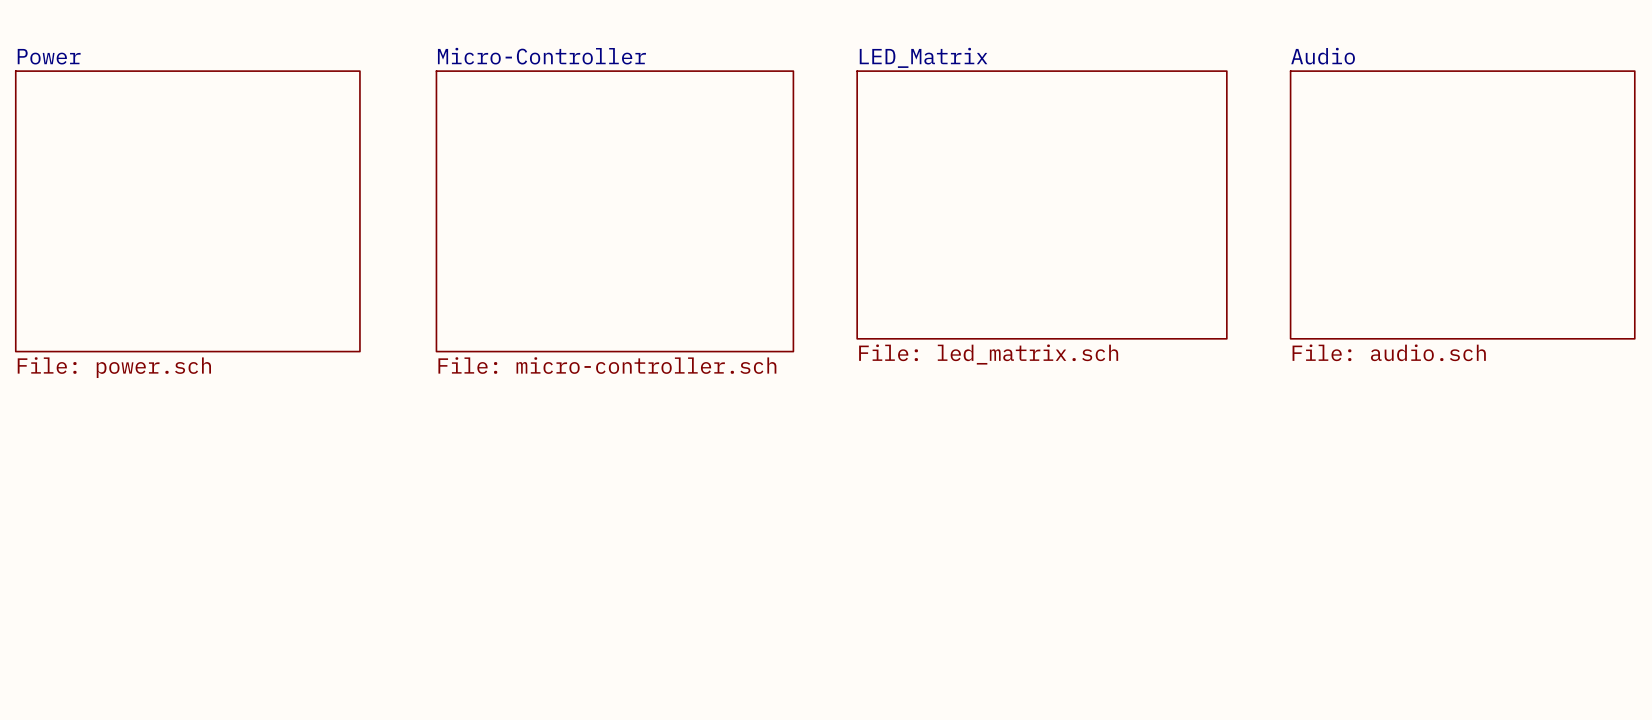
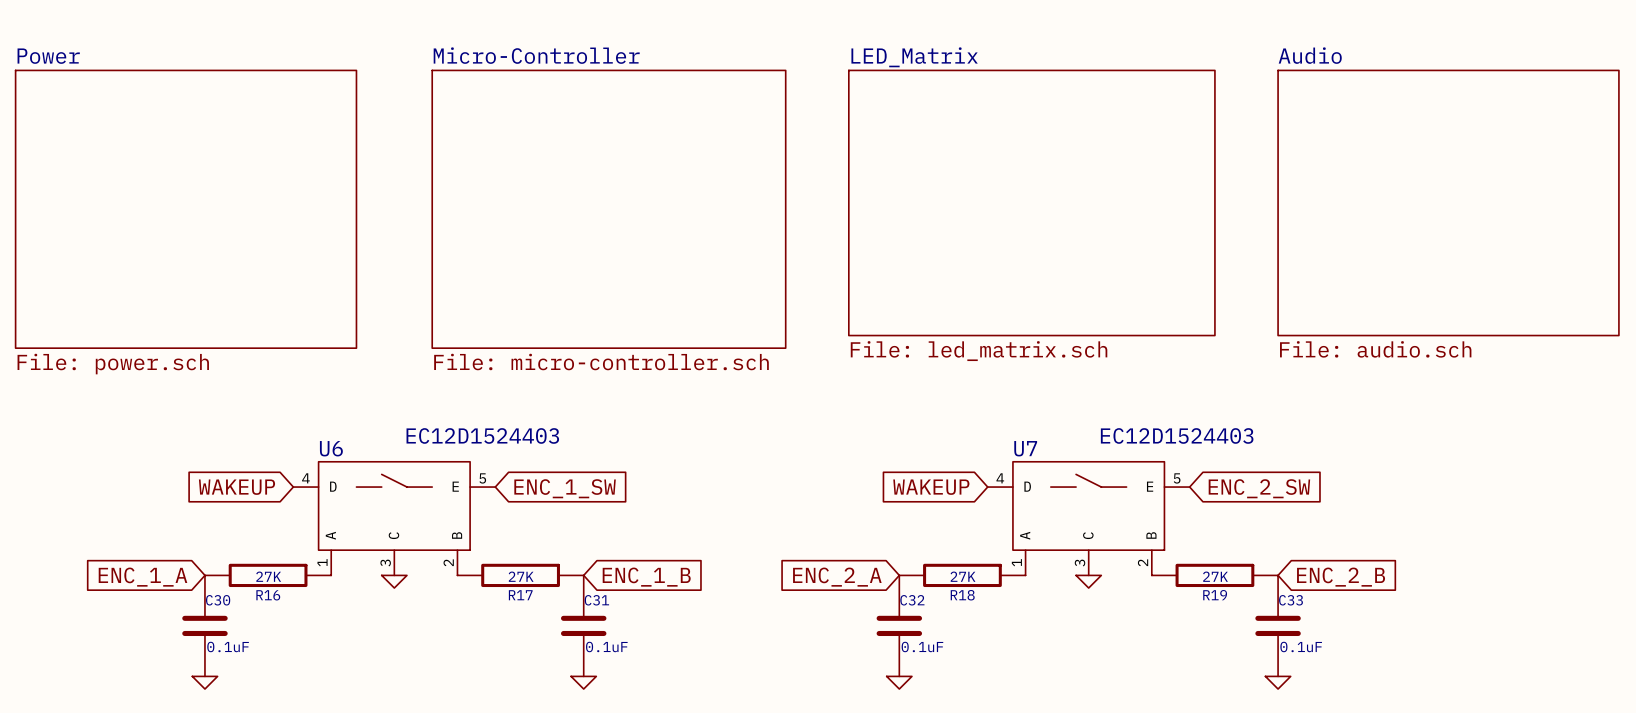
global label: none -> WAKEUP (236, 487)
global label: none -> WAKEUP (931, 487)
global label: none -> ENC_1_SW (565, 488)
global label: none -> ENC_2_SW (1259, 488)
U6: none -> EC12D1524403 (394, 518)
U7: none -> EC12D1524403 (1088, 518)
R16: none -> 27K (268, 575)
R17: none -> 27K (520, 575)
R18: none -> 27K (962, 575)
R19: none -> 27K (1214, 575)
global label: none -> ENC_1_A (142, 577)
global label: none -> ENC_1_B (646, 577)
global label: none -> ENC_2_A (837, 577)
global label: none -> ENC_2_B (1341, 577)
power symbol: none -> (394, 581)
power symbol: none -> (1088, 581)
C30: none -> 0.1uF (204, 625)
C31: none -> 0.1uF (583, 625)
C32: none -> 0.1uF (899, 625)
C33: none -> 0.1uF (1278, 625)
power symbol: none -> (204, 682)
power symbol: none -> (583, 682)
power symbol: none -> (899, 682)
power symbol: none -> (1278, 682)

